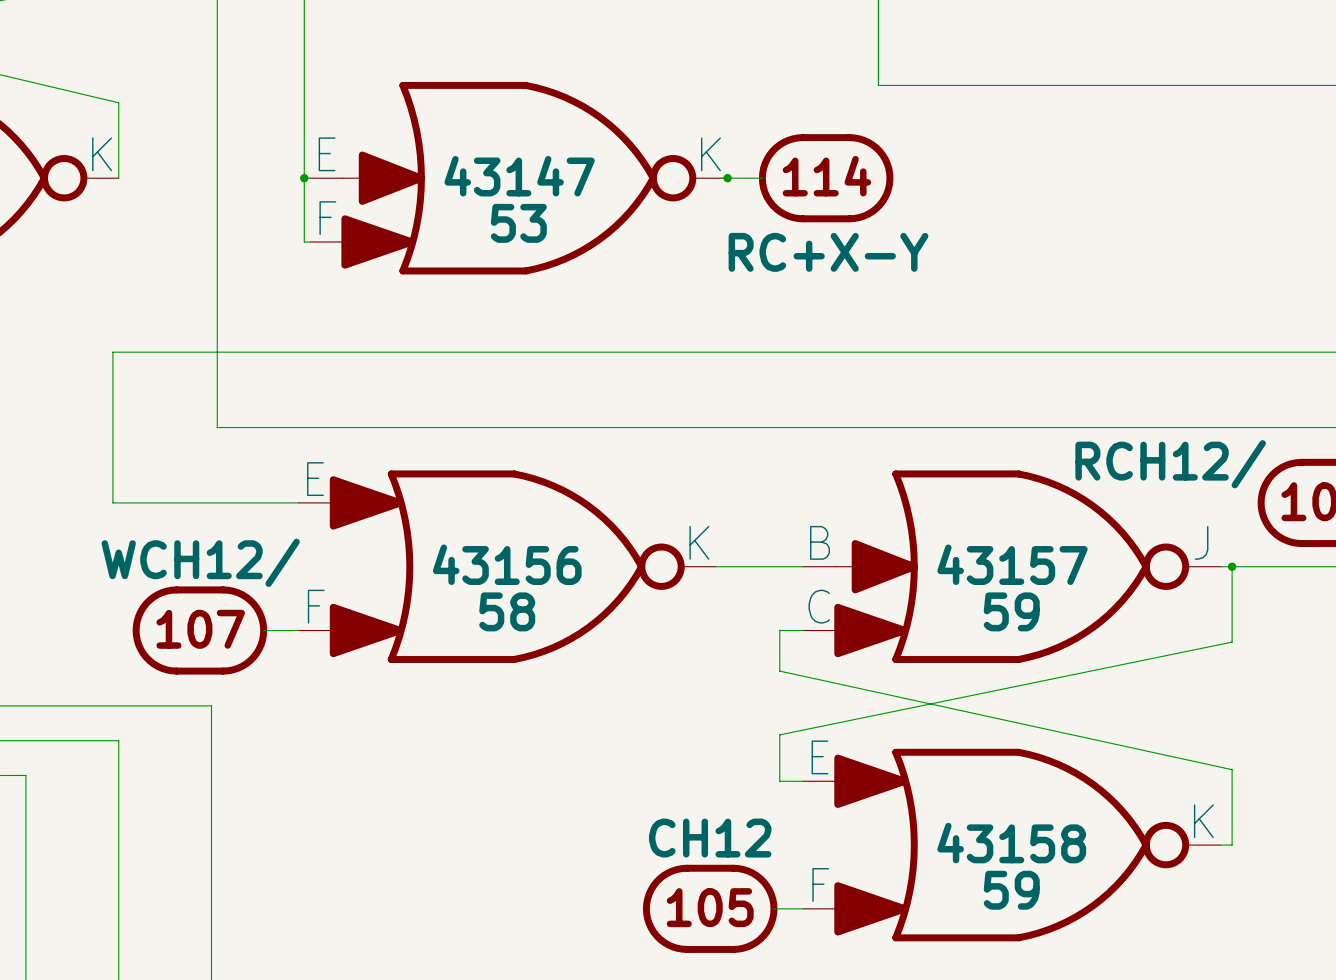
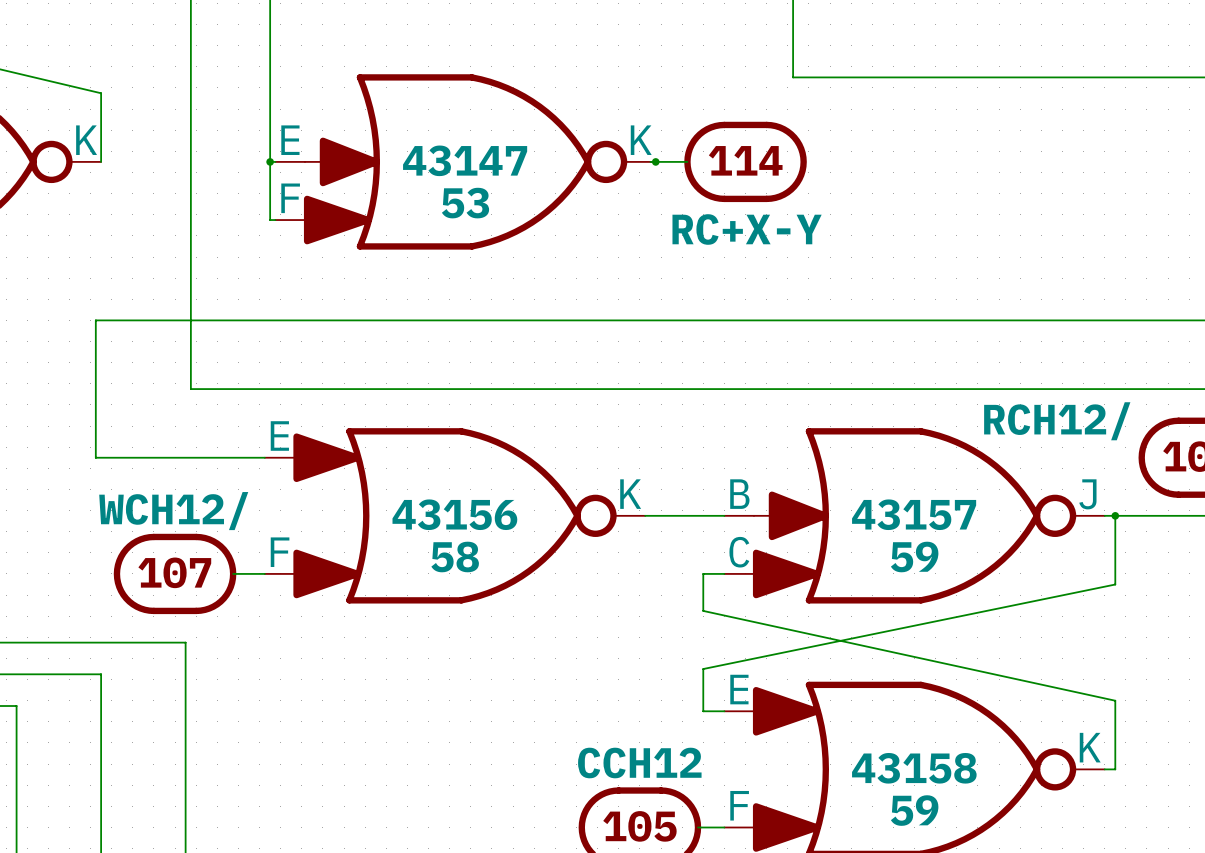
part text: CH12 (710, 838) -> CCH12 (639, 763)

